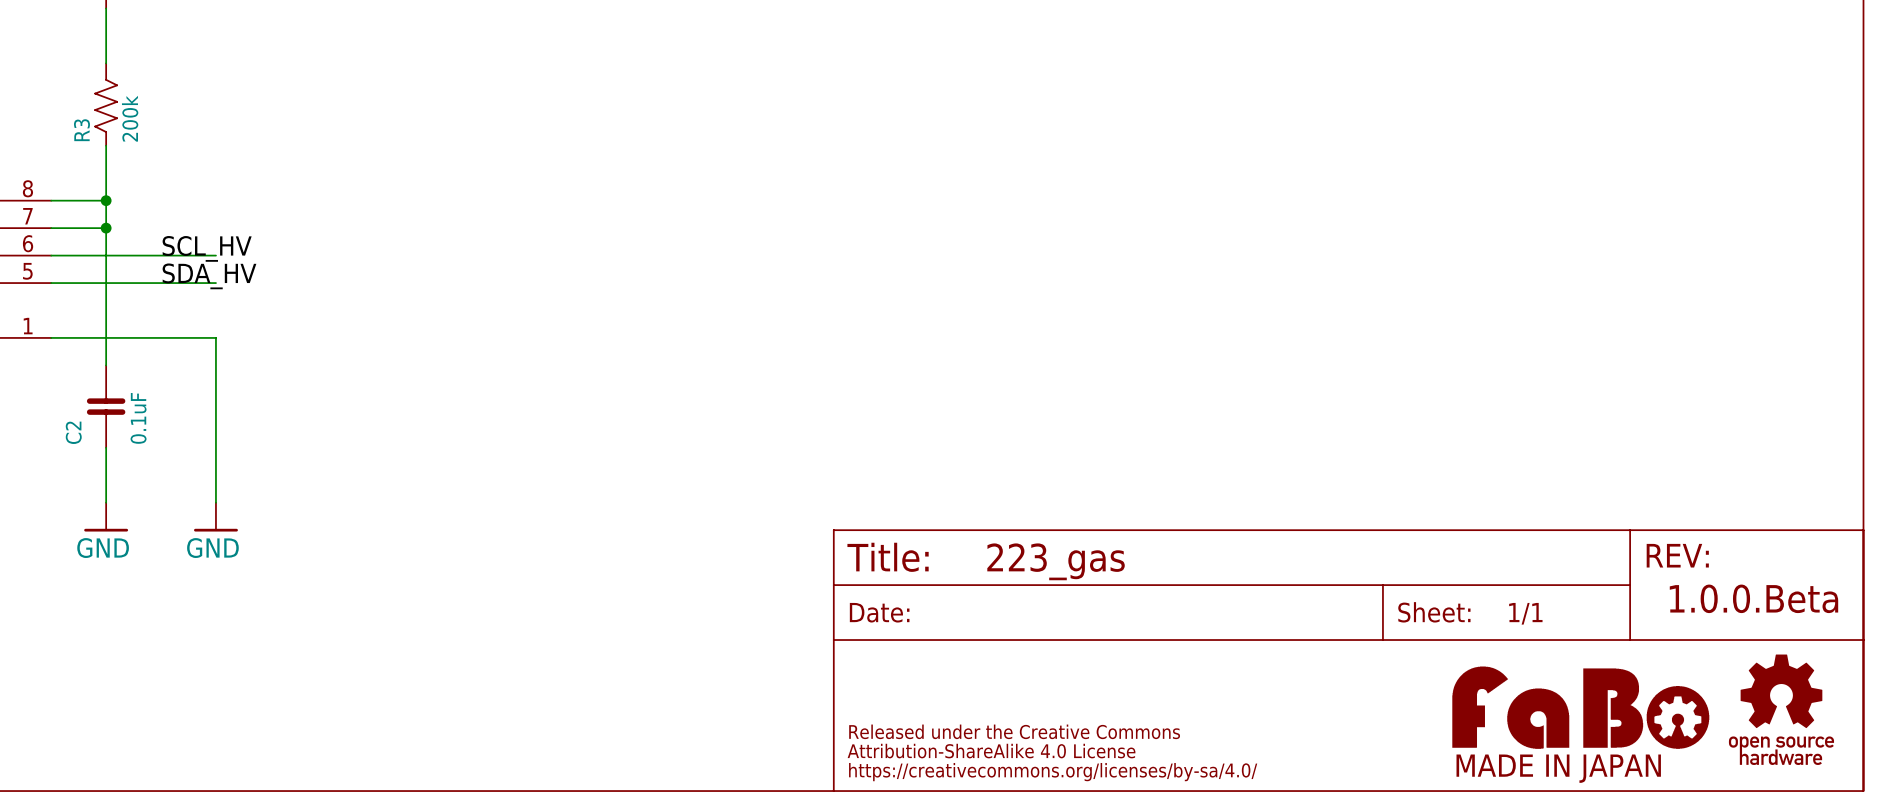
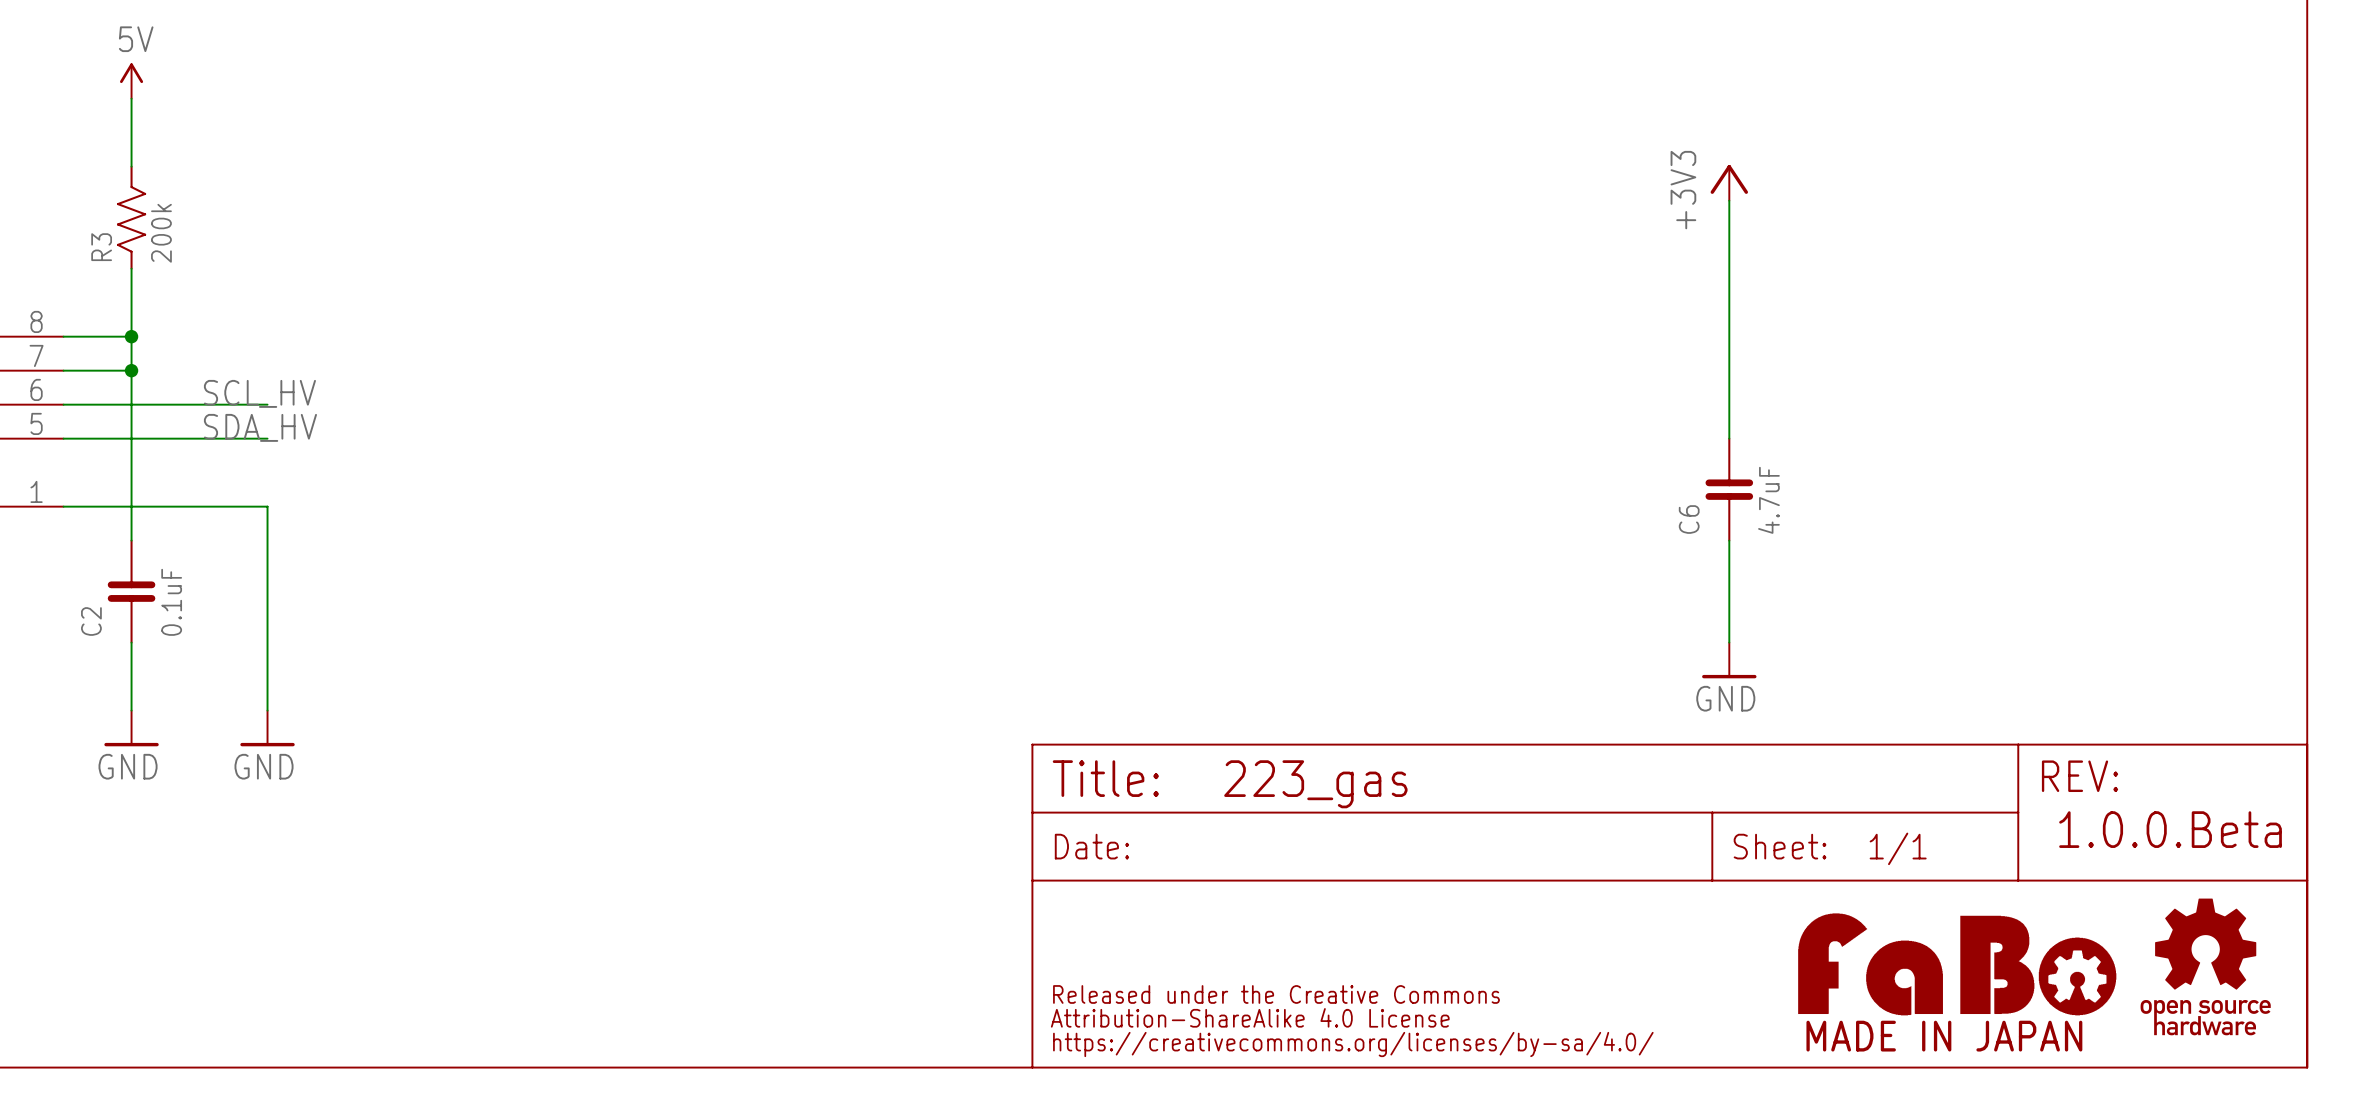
power symbol: none -> +3V3 (1729, 182)
wire: none -> (1729, 200) (1729, 438)
C6: none -> 4.7uF (1729, 489)
wire: none -> (1729, 540) (1729, 642)
power symbol: none -> GND (1729, 660)

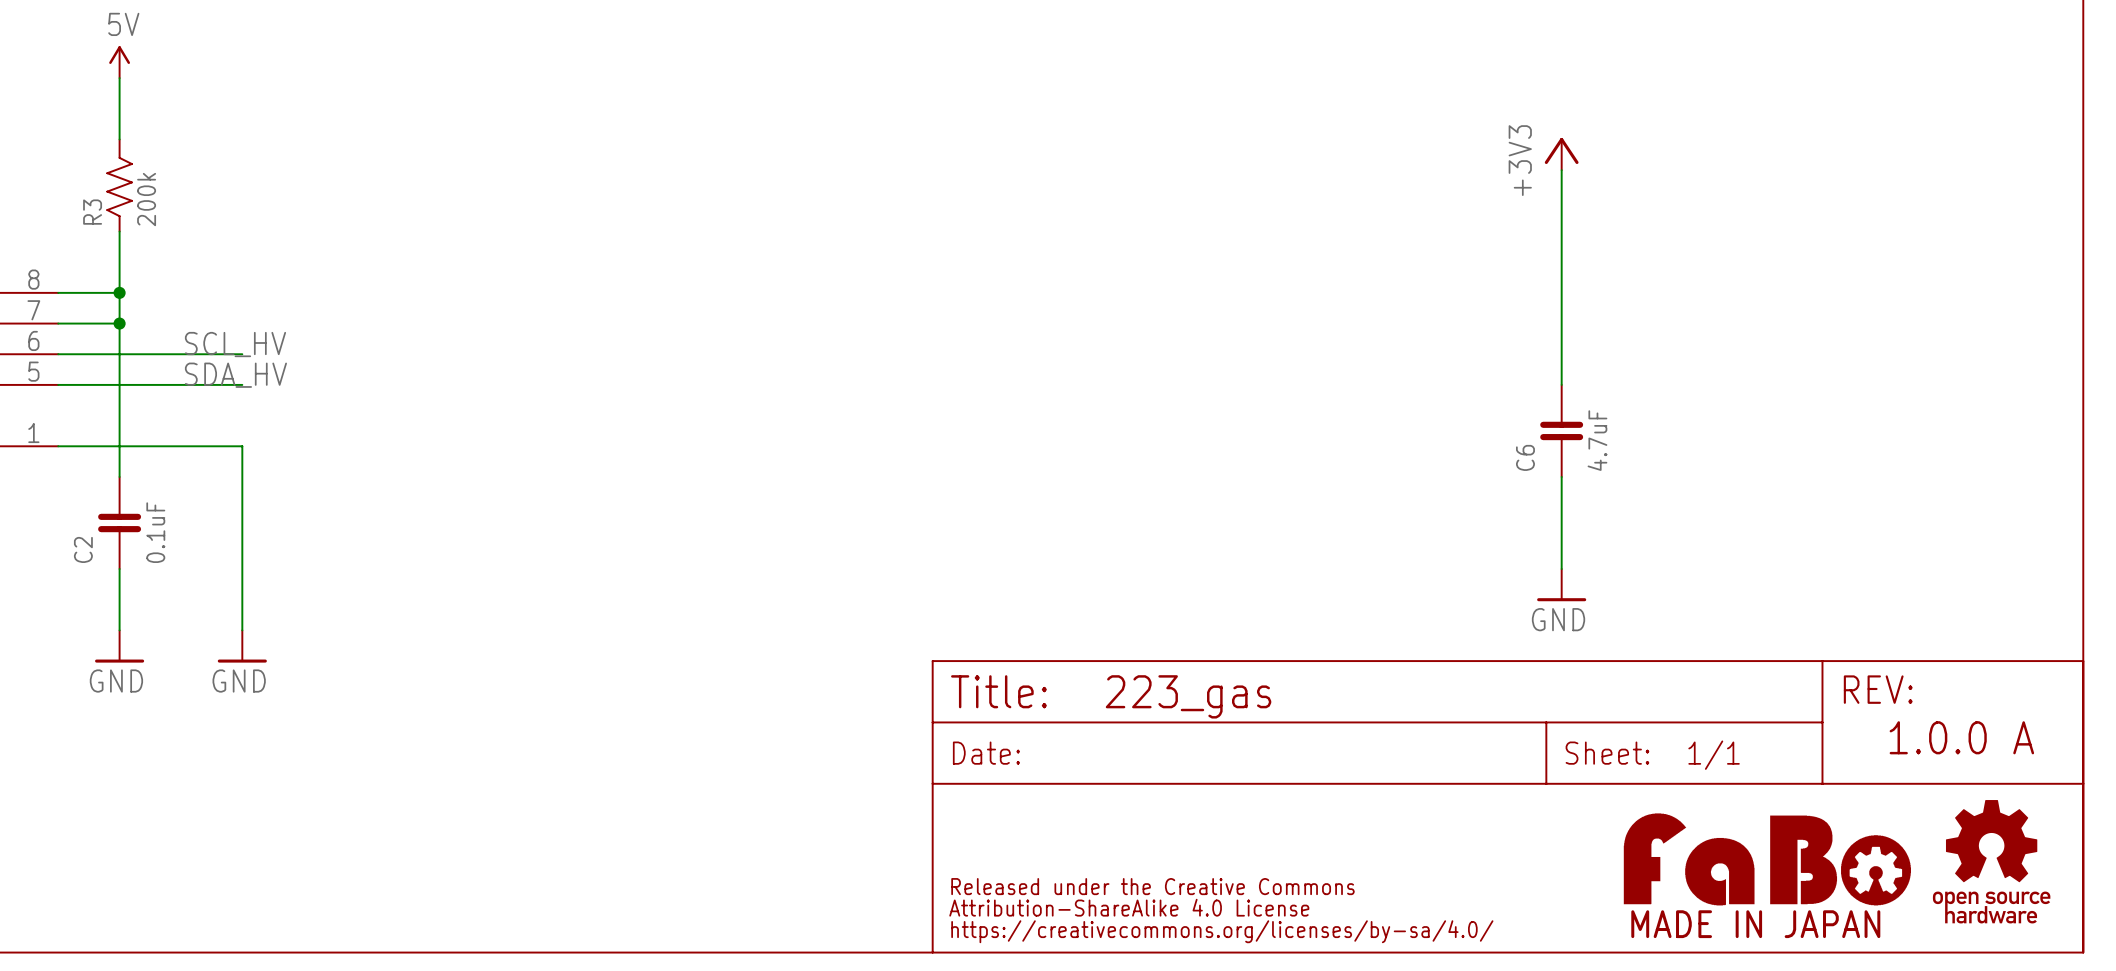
text: 1.0.0.Beta (2170, 829) -> 1.0.0 A (1961, 737)

